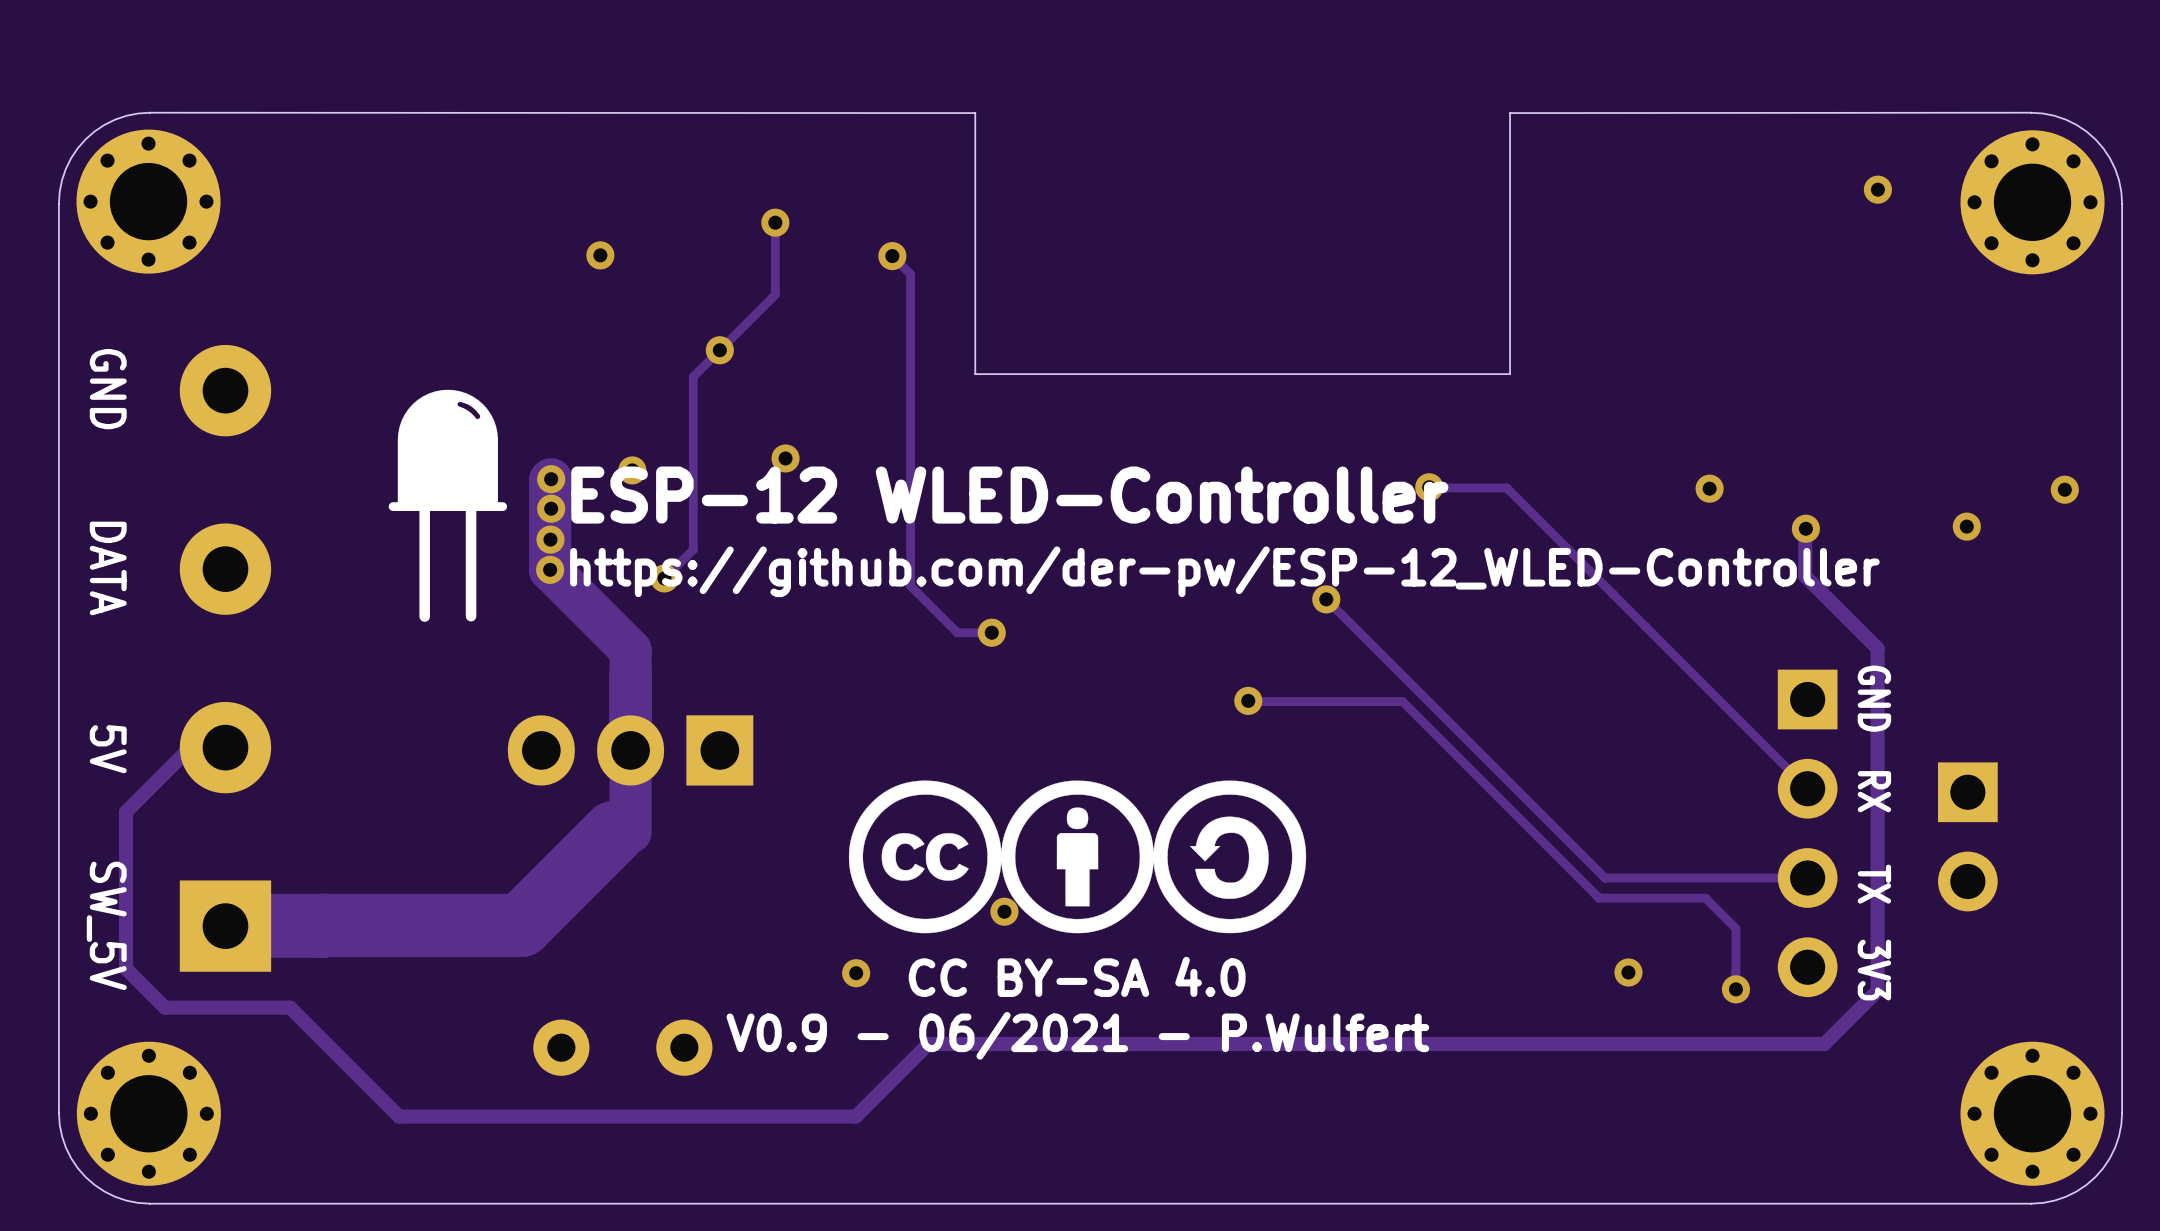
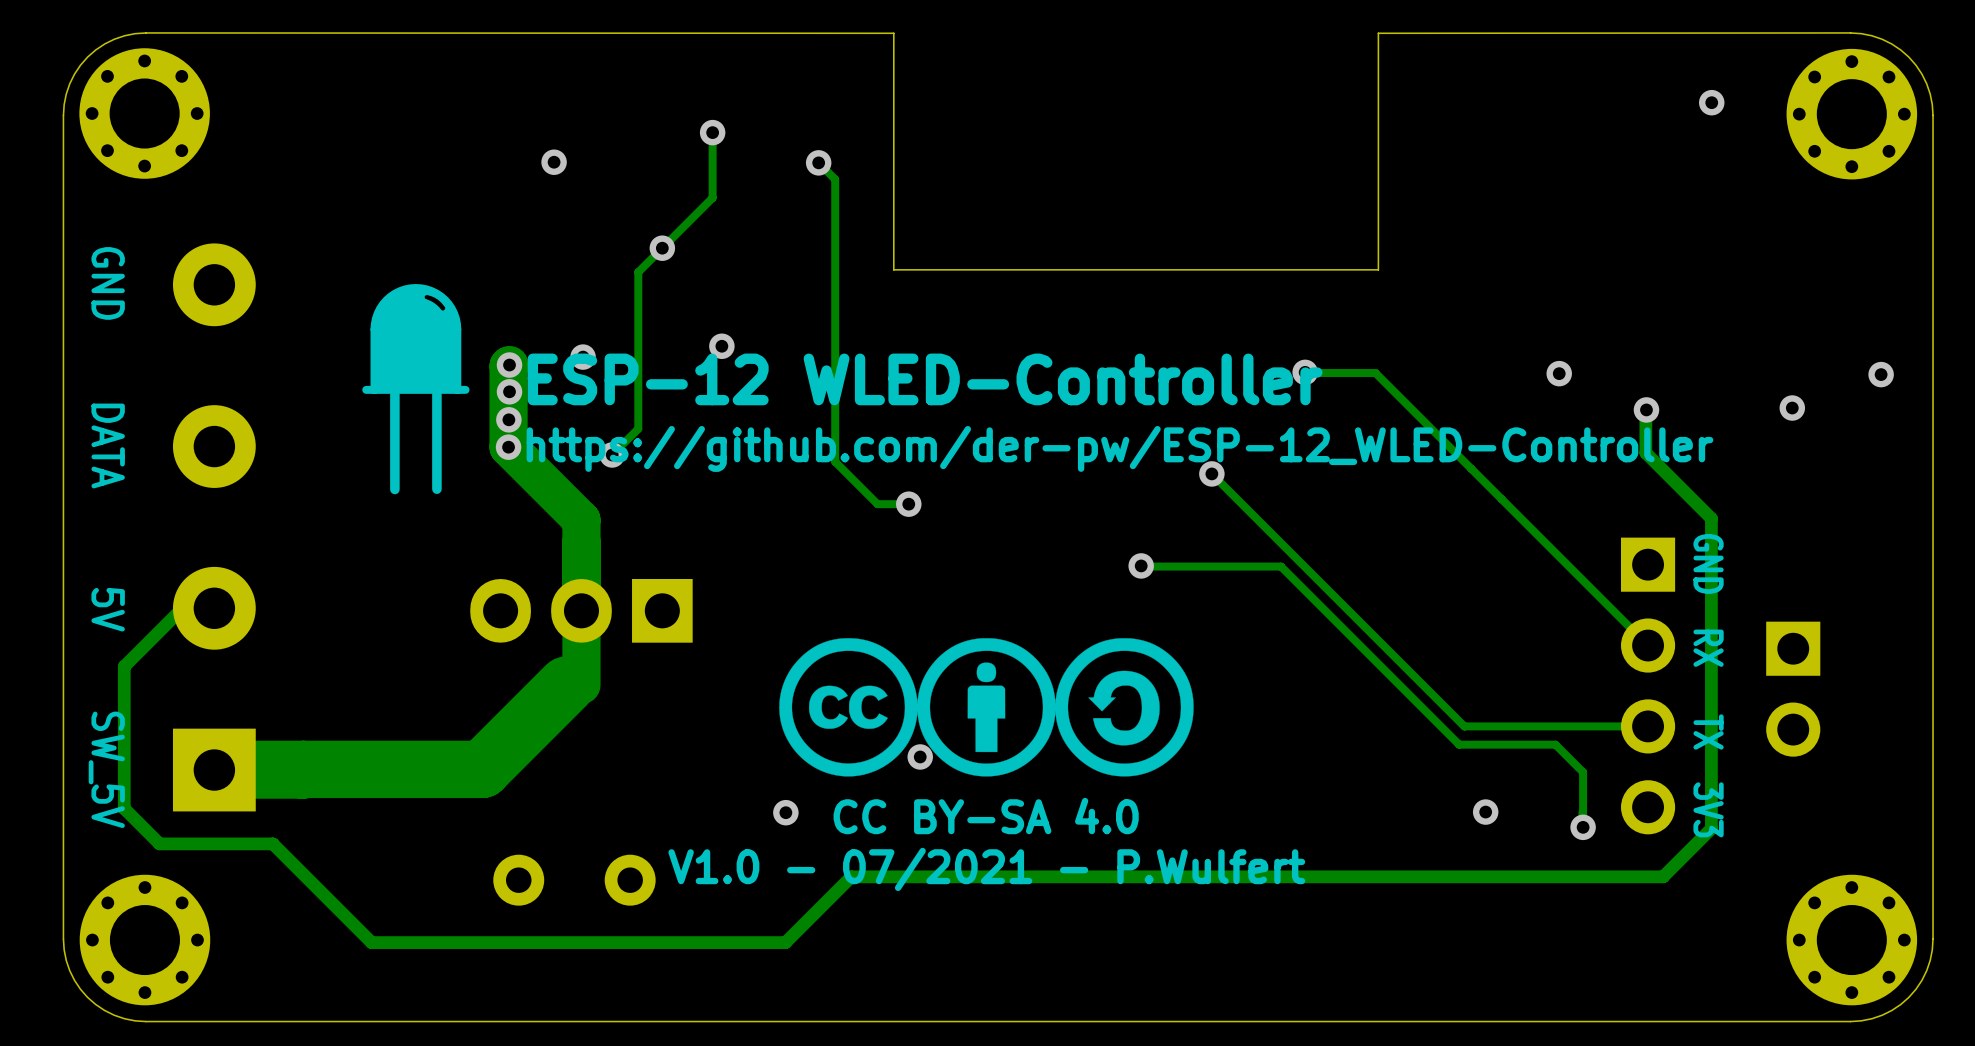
text: V0.9 - 06/2021 - P.Wulfert (1077, 1035) -> V1.0 - 07/2021 - P.Wulfert (986, 869)

